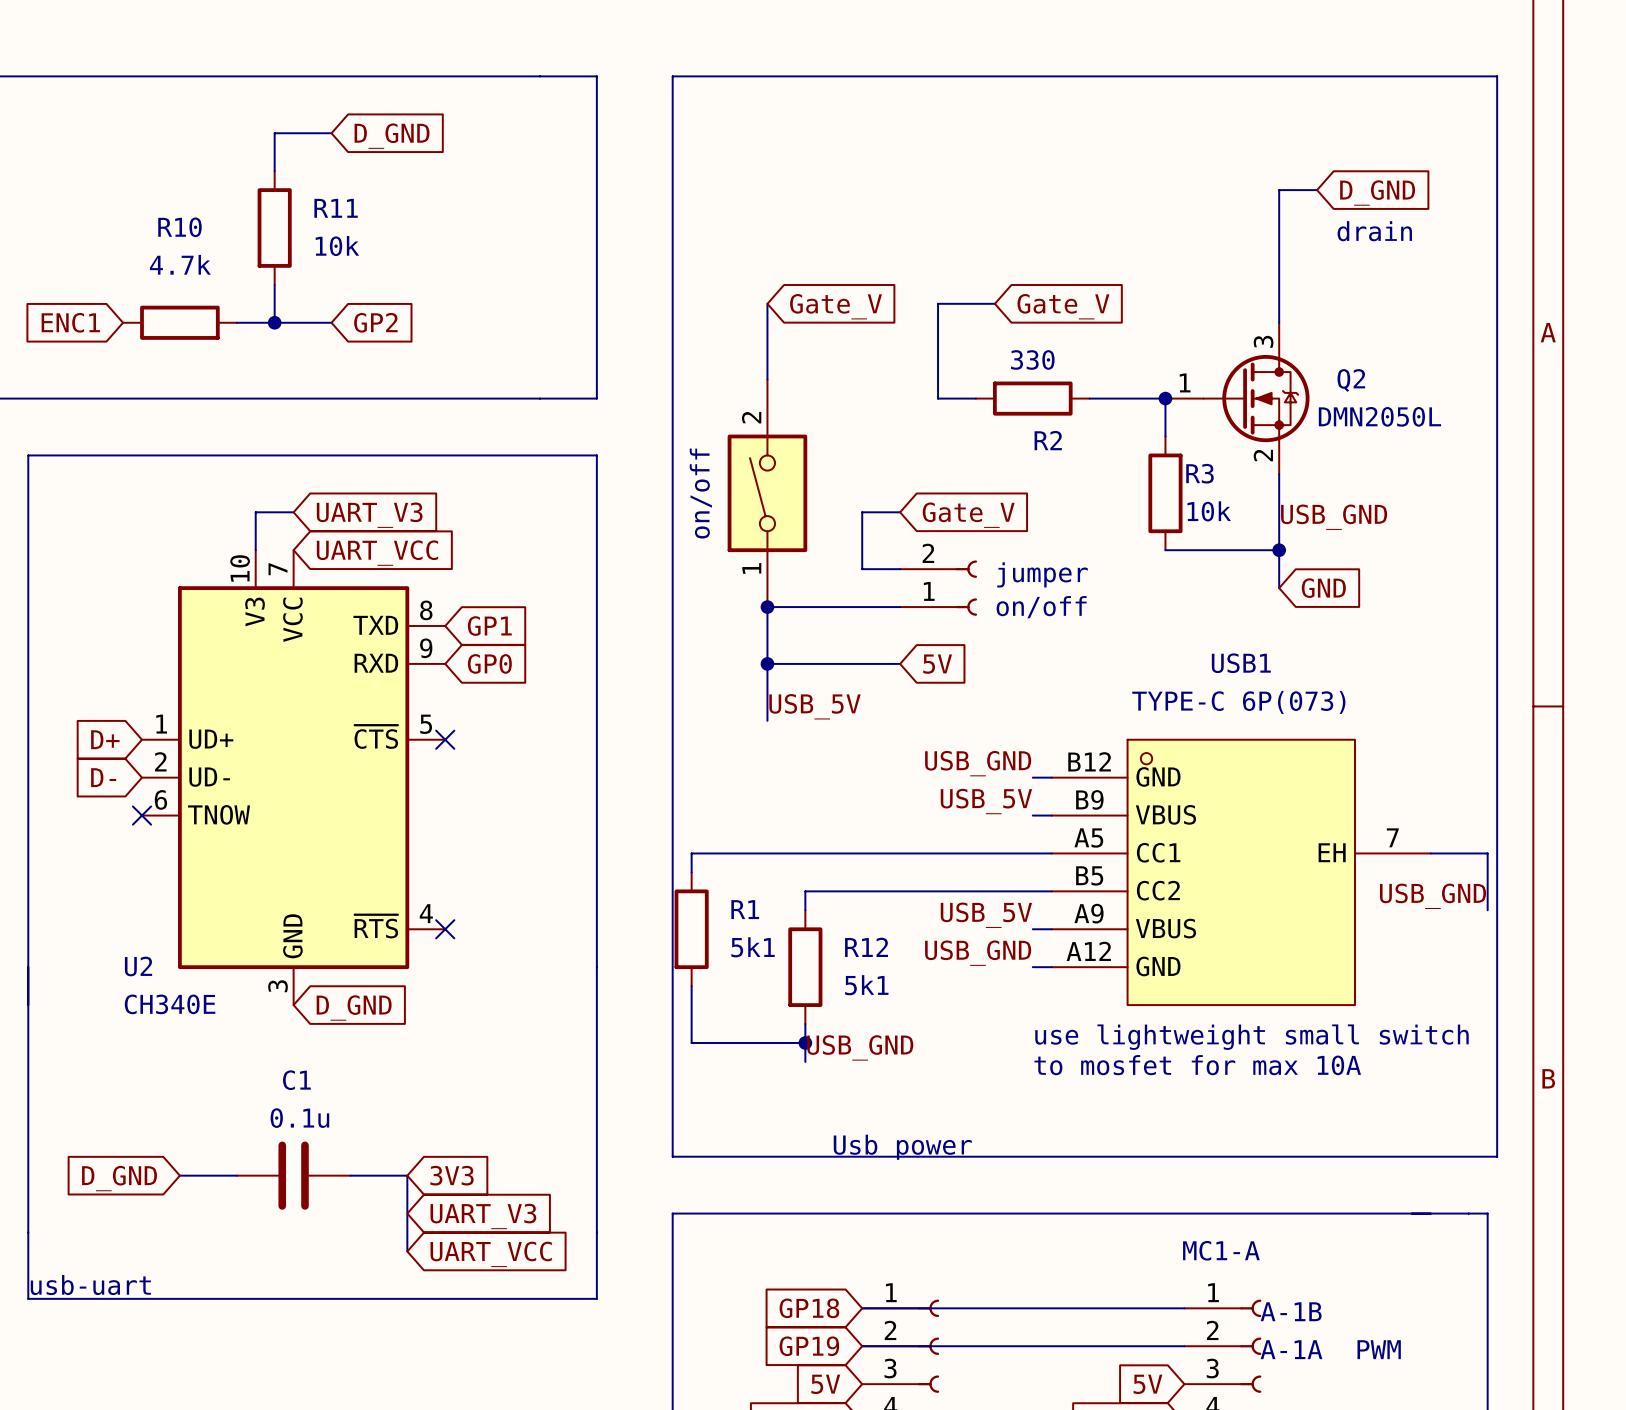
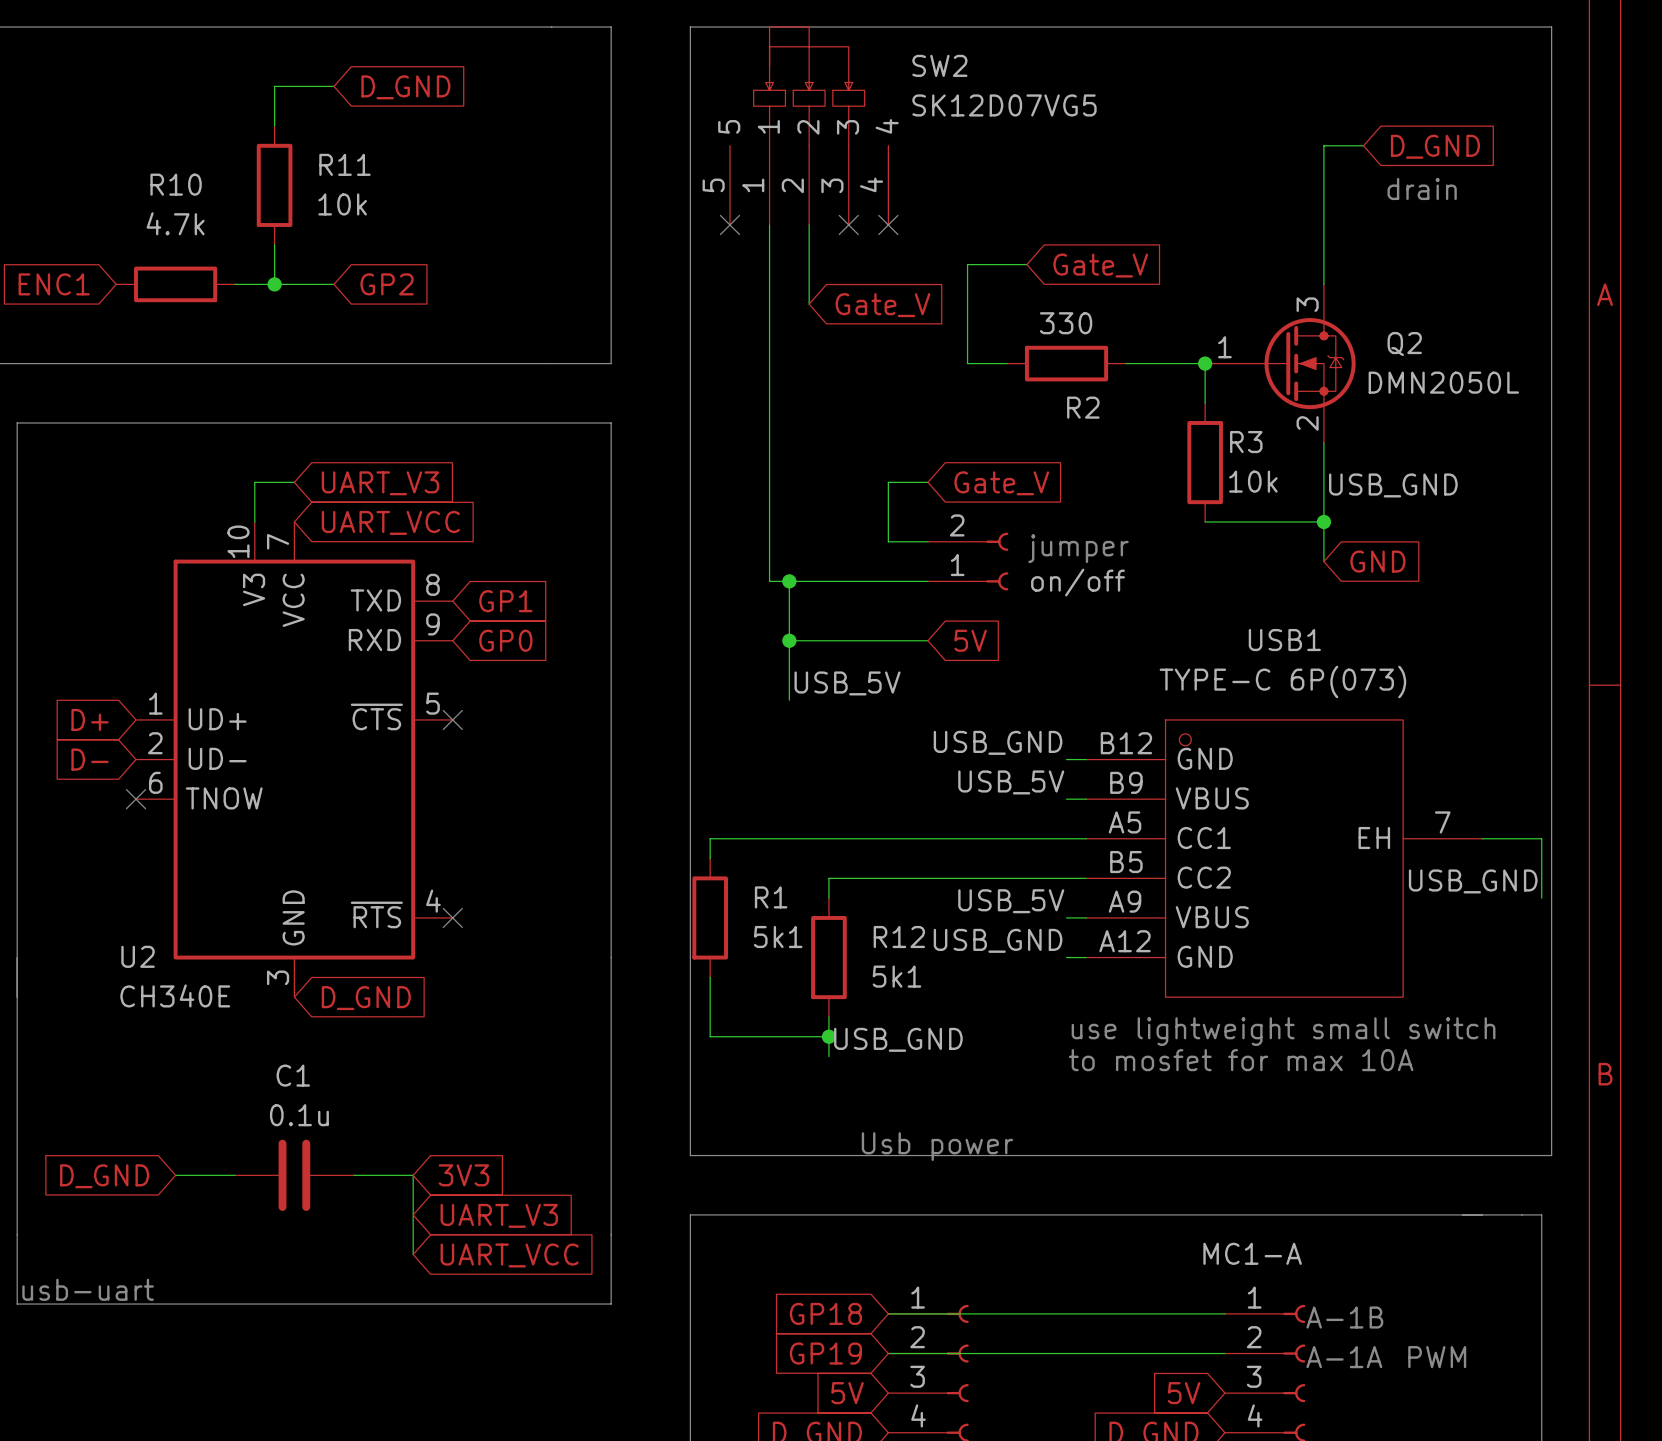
SW2: none -> SK12D07VG5 (809, 126)
no-connect mark: none -> (729, 224)
wire: none -> (769, 224) (769, 581) (789, 581)
no-connect mark: none -> (848, 224)
no-connect mark: none -> (888, 224)
wire: (767, 303) (767, 379) -> (809, 224) (809, 304)
global label position: Gate_V (836, 306) -> Gate_V (882, 305)
part: on/off (767, 493) -> none

